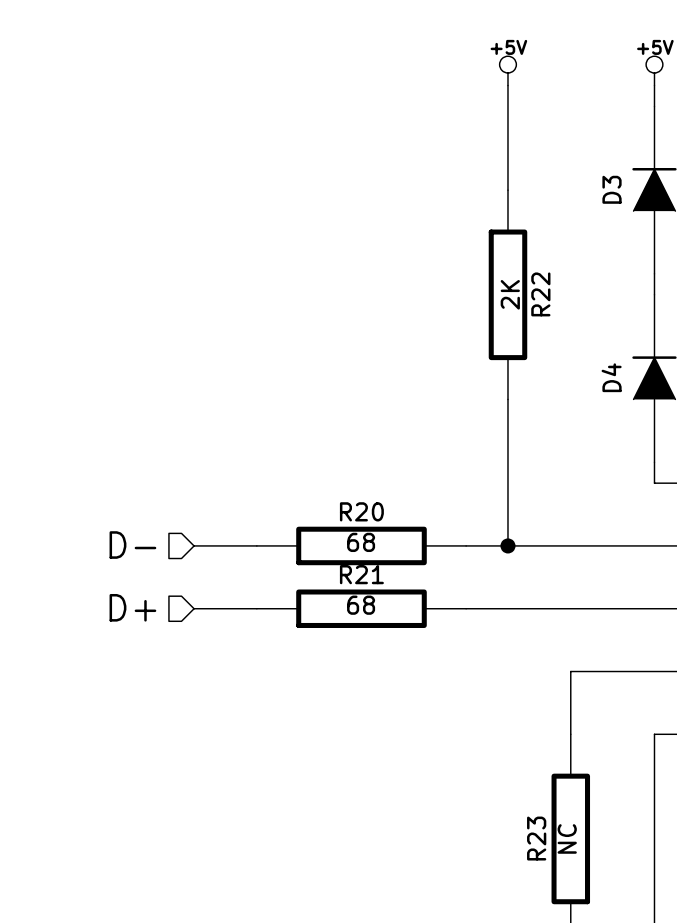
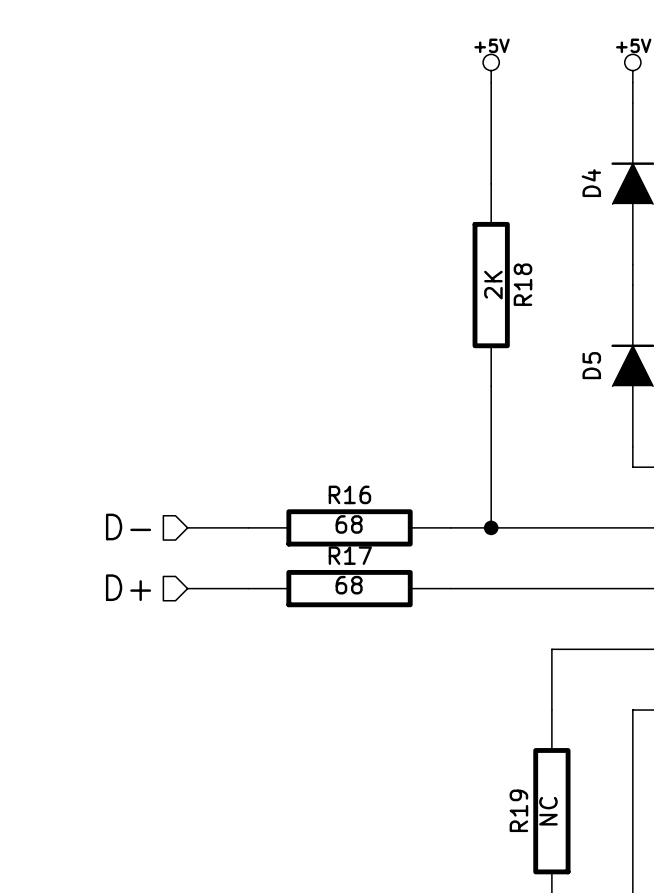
D3 name: D3 (612, 189) -> D4 (591, 183)
R22 name: R22 (540, 294) -> R18 (522, 284)
D4 name: D4 (611, 377) -> D5 (591, 365)
R20 name: R20 (361, 511) -> R16 (349, 494)
R21 name: R21 (361, 574) -> R17 (350, 555)
R23 name: R23 (536, 838) -> R19 (518, 810)

